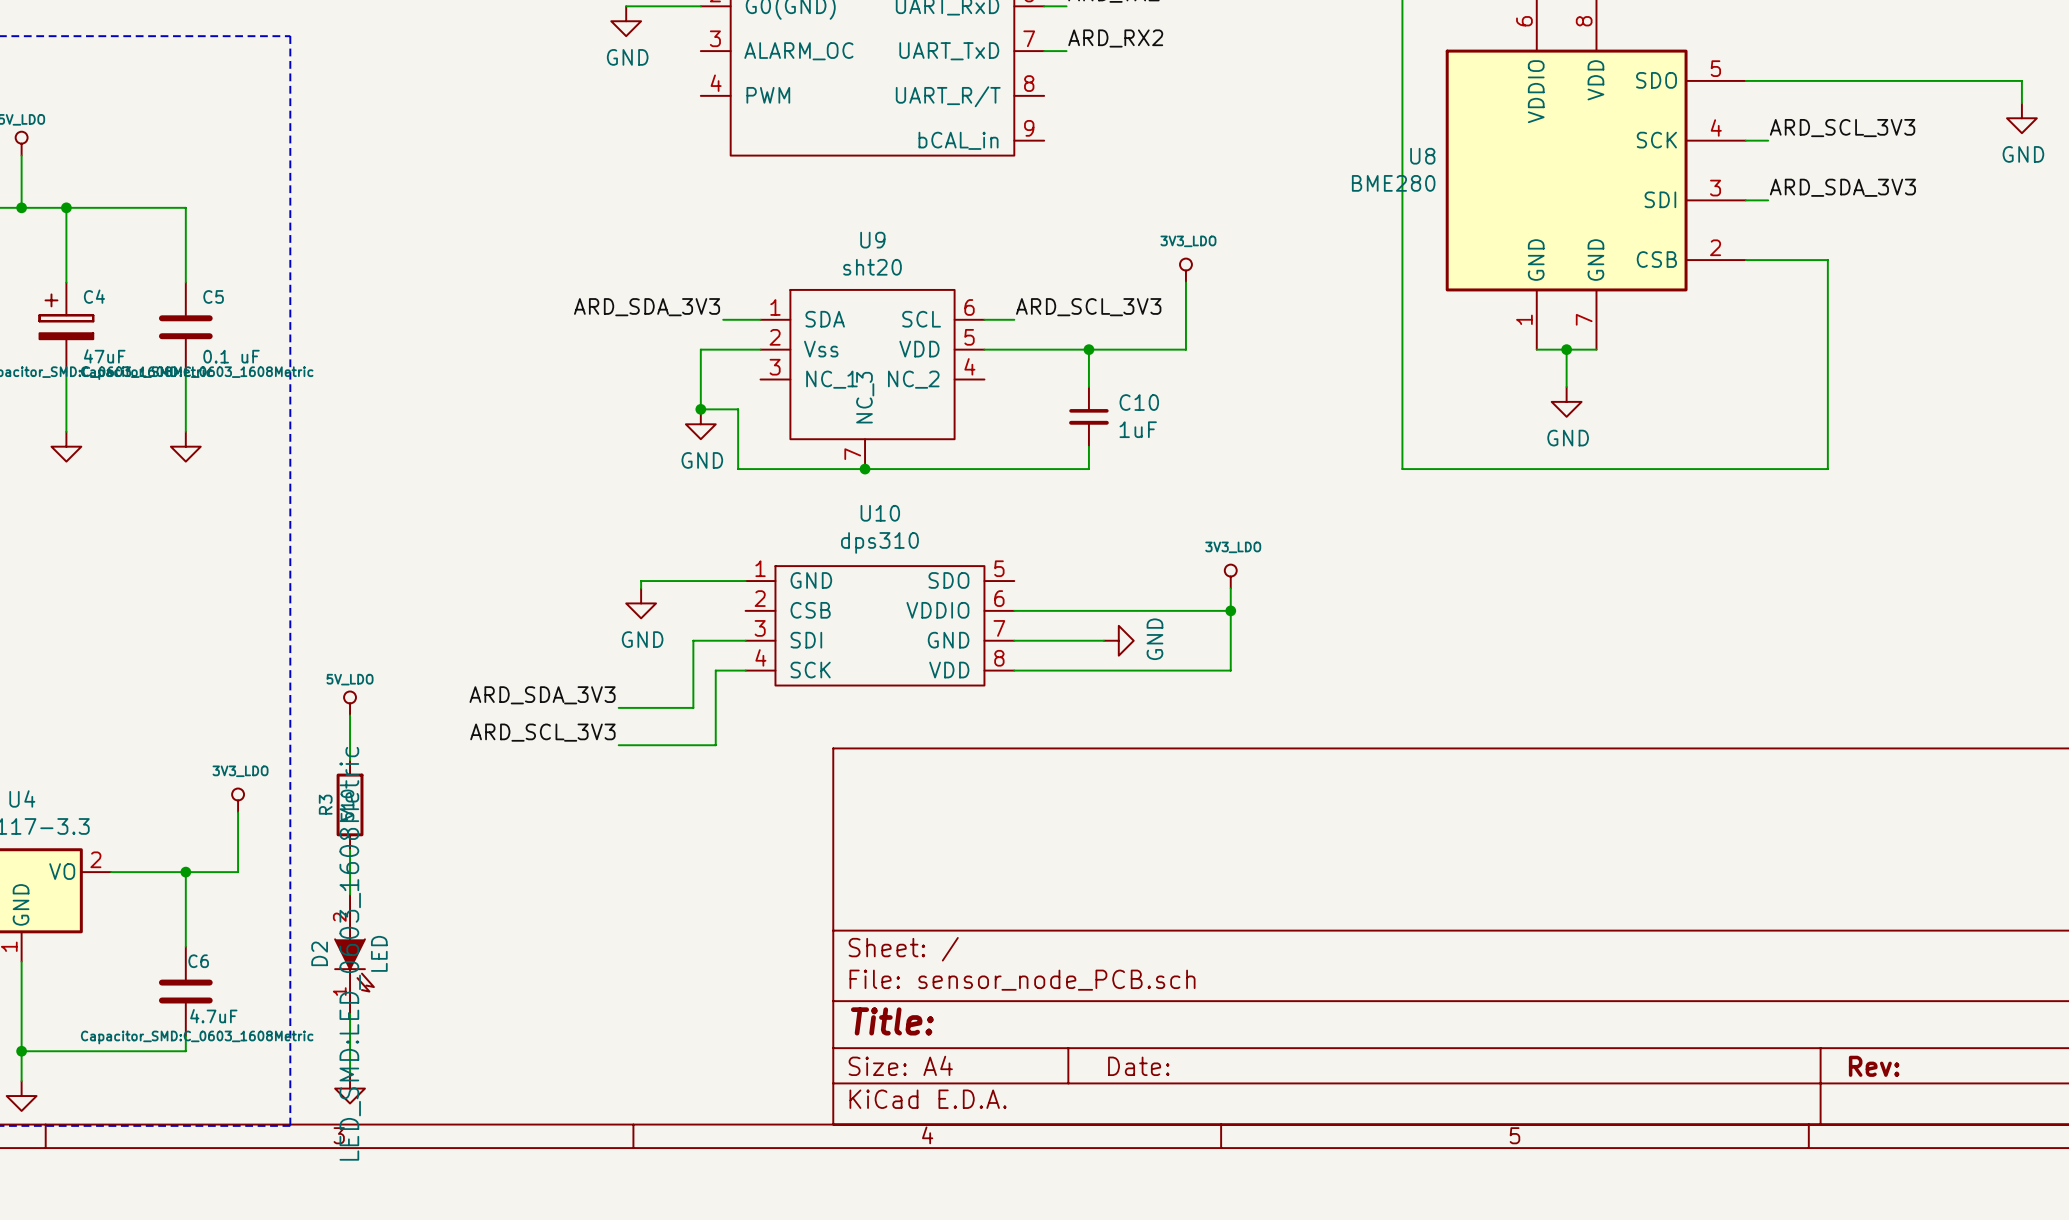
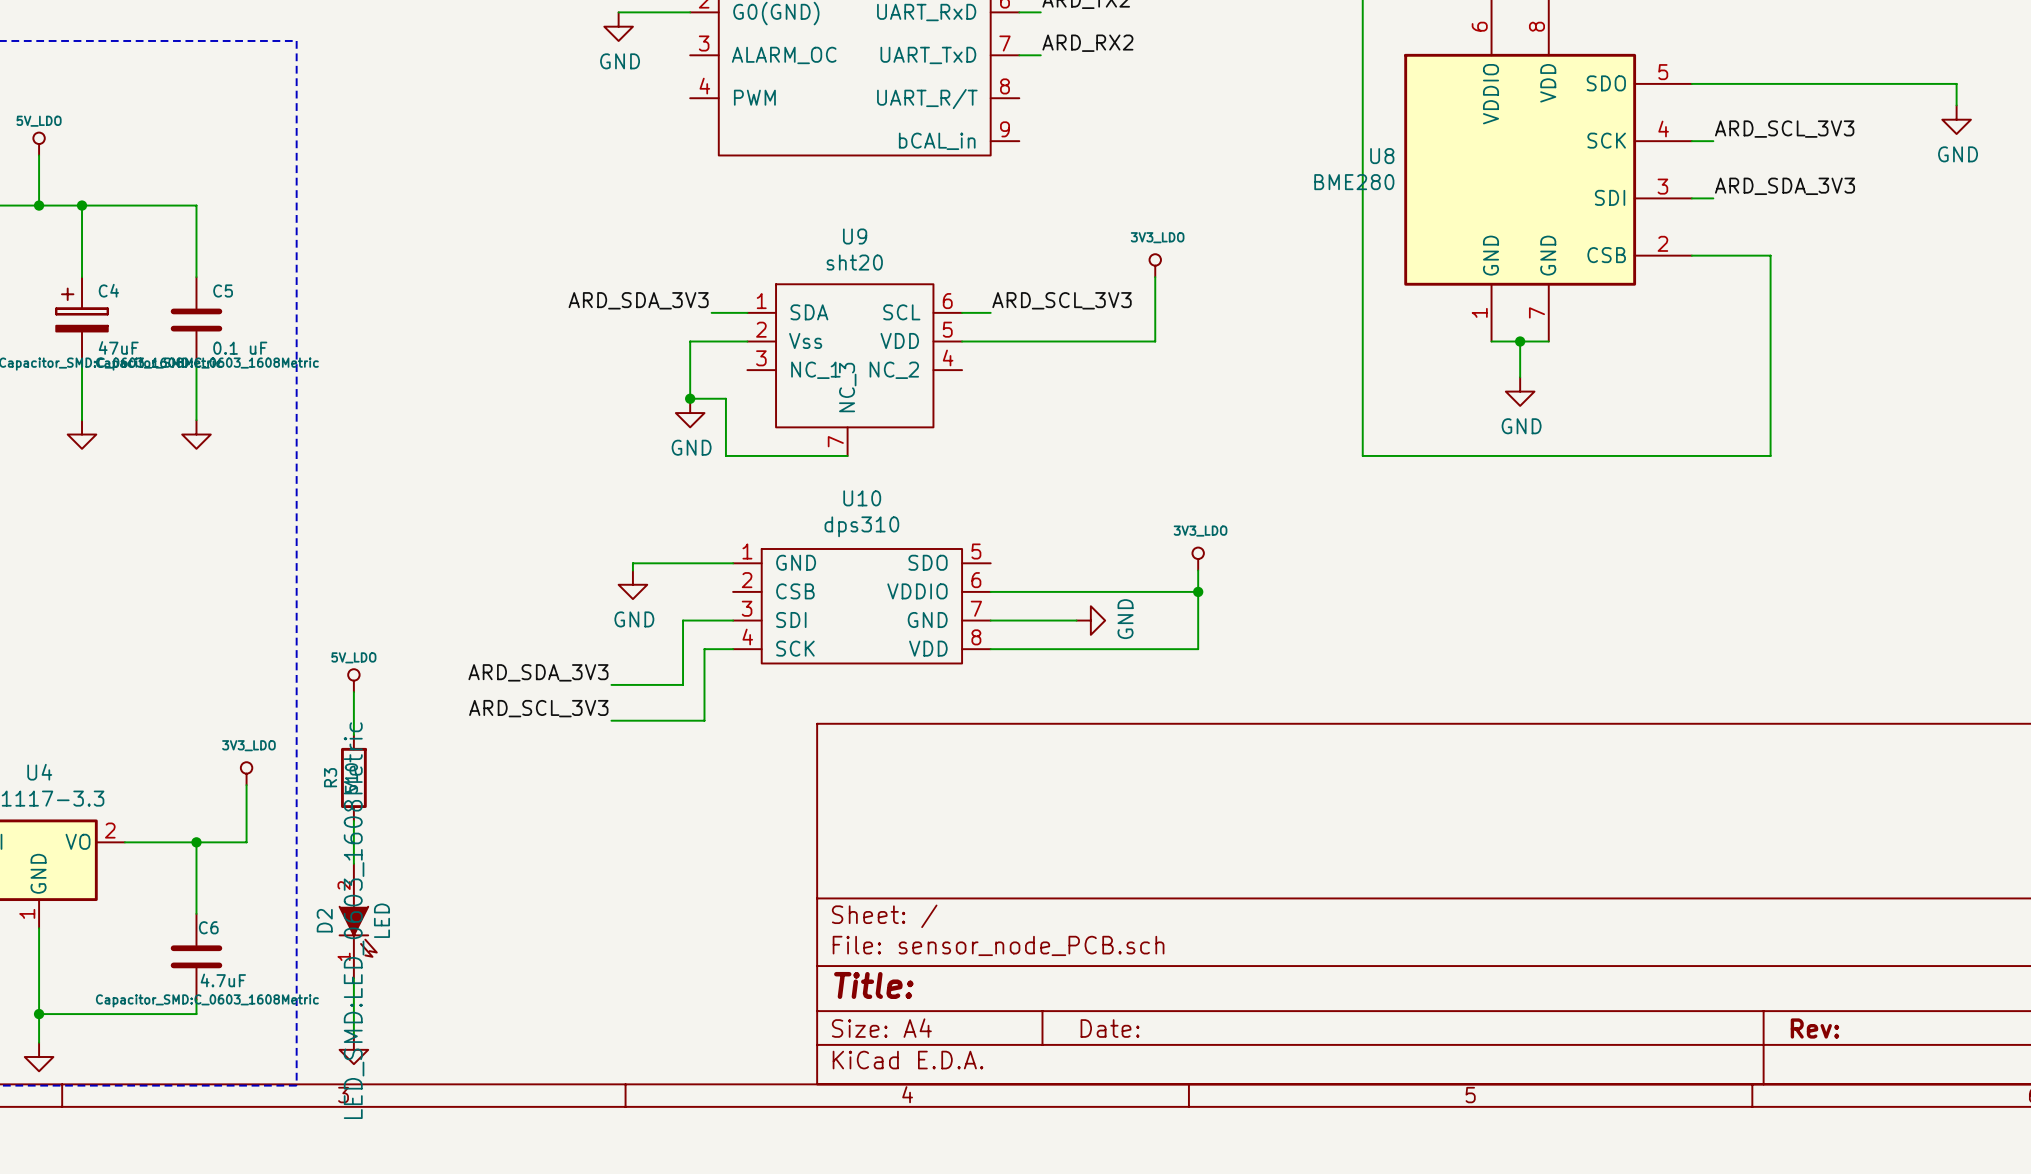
wire: (1088, 349) (1088, 386) -> none
junction: (1088, 349) -> none
C10: 1uF (1088, 416) -> none
wire: (1088, 446) (1088, 469) (865, 469) -> none
junction: (865, 469) -> none

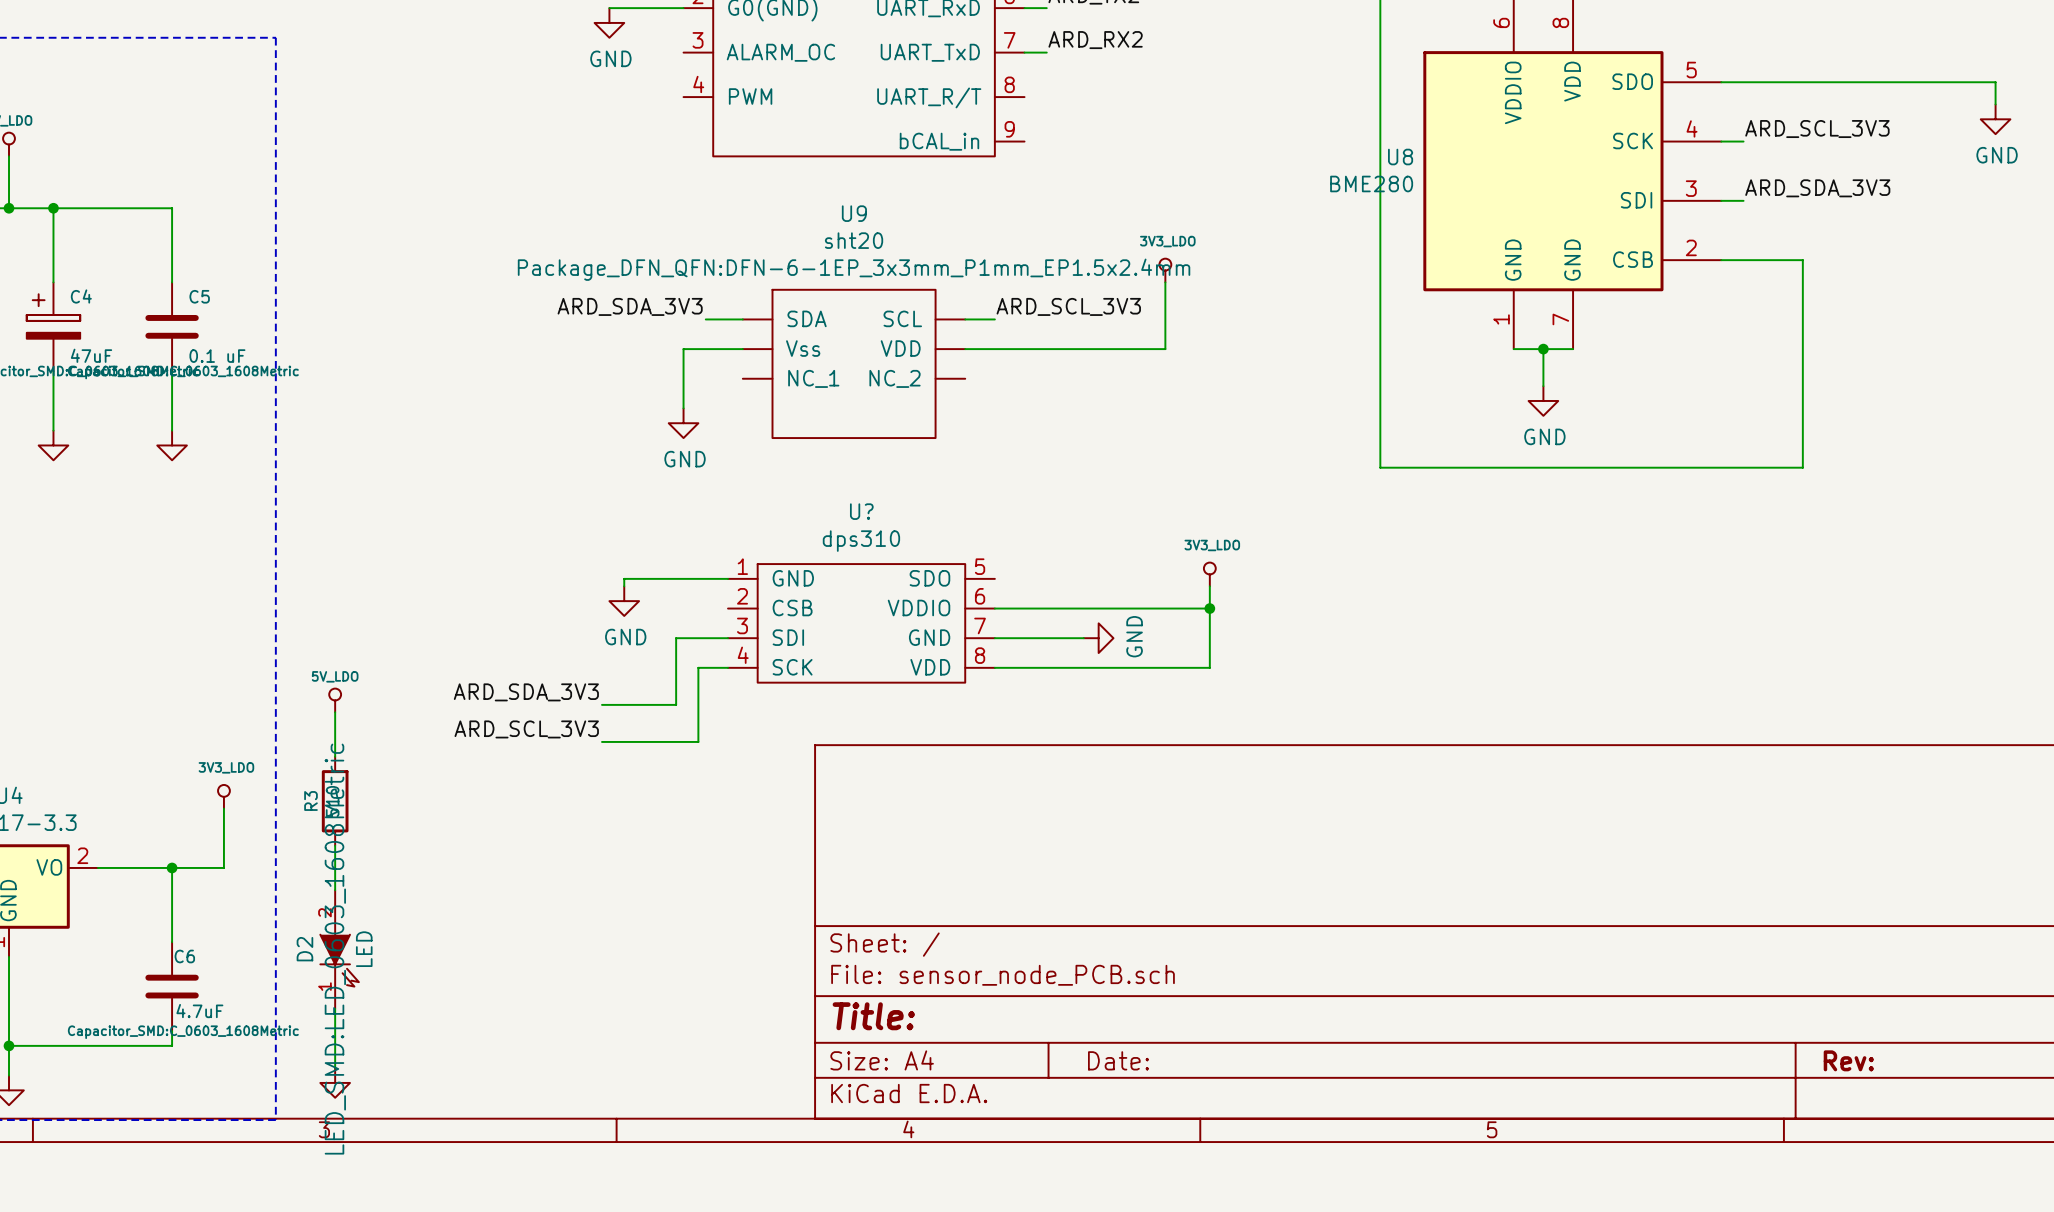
U9 text: none -> Package_DFN_QFN:DFN-6-1EP_3x3mm_P1mm_EP1.5x2.4mm (854, 269)
U9 symbol: [747, 284, 963, 456] -> [742, 289, 966, 439]
wire: (690, 398) (725, 398) (725, 455) (847, 455) -> none
junction: (690, 398) -> none
U10 name: U10 (862, 498) -> U? (861, 511)

